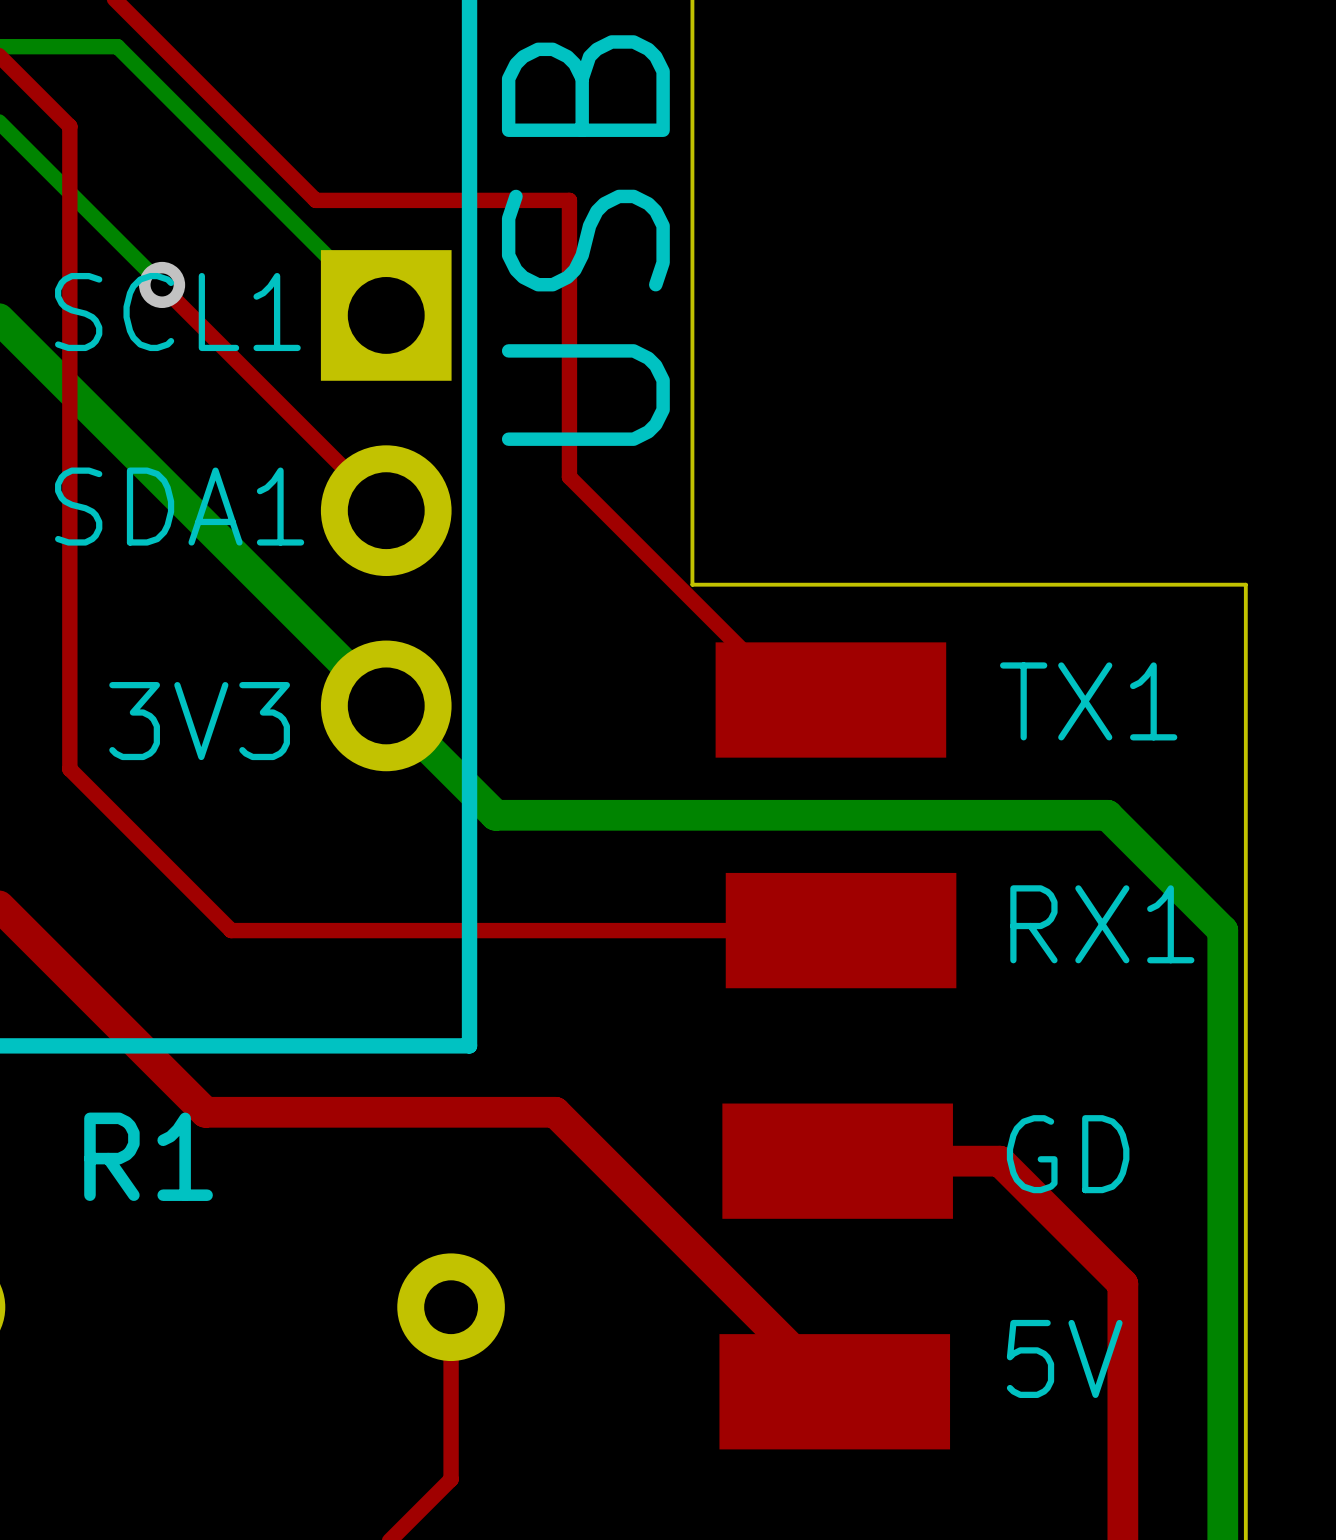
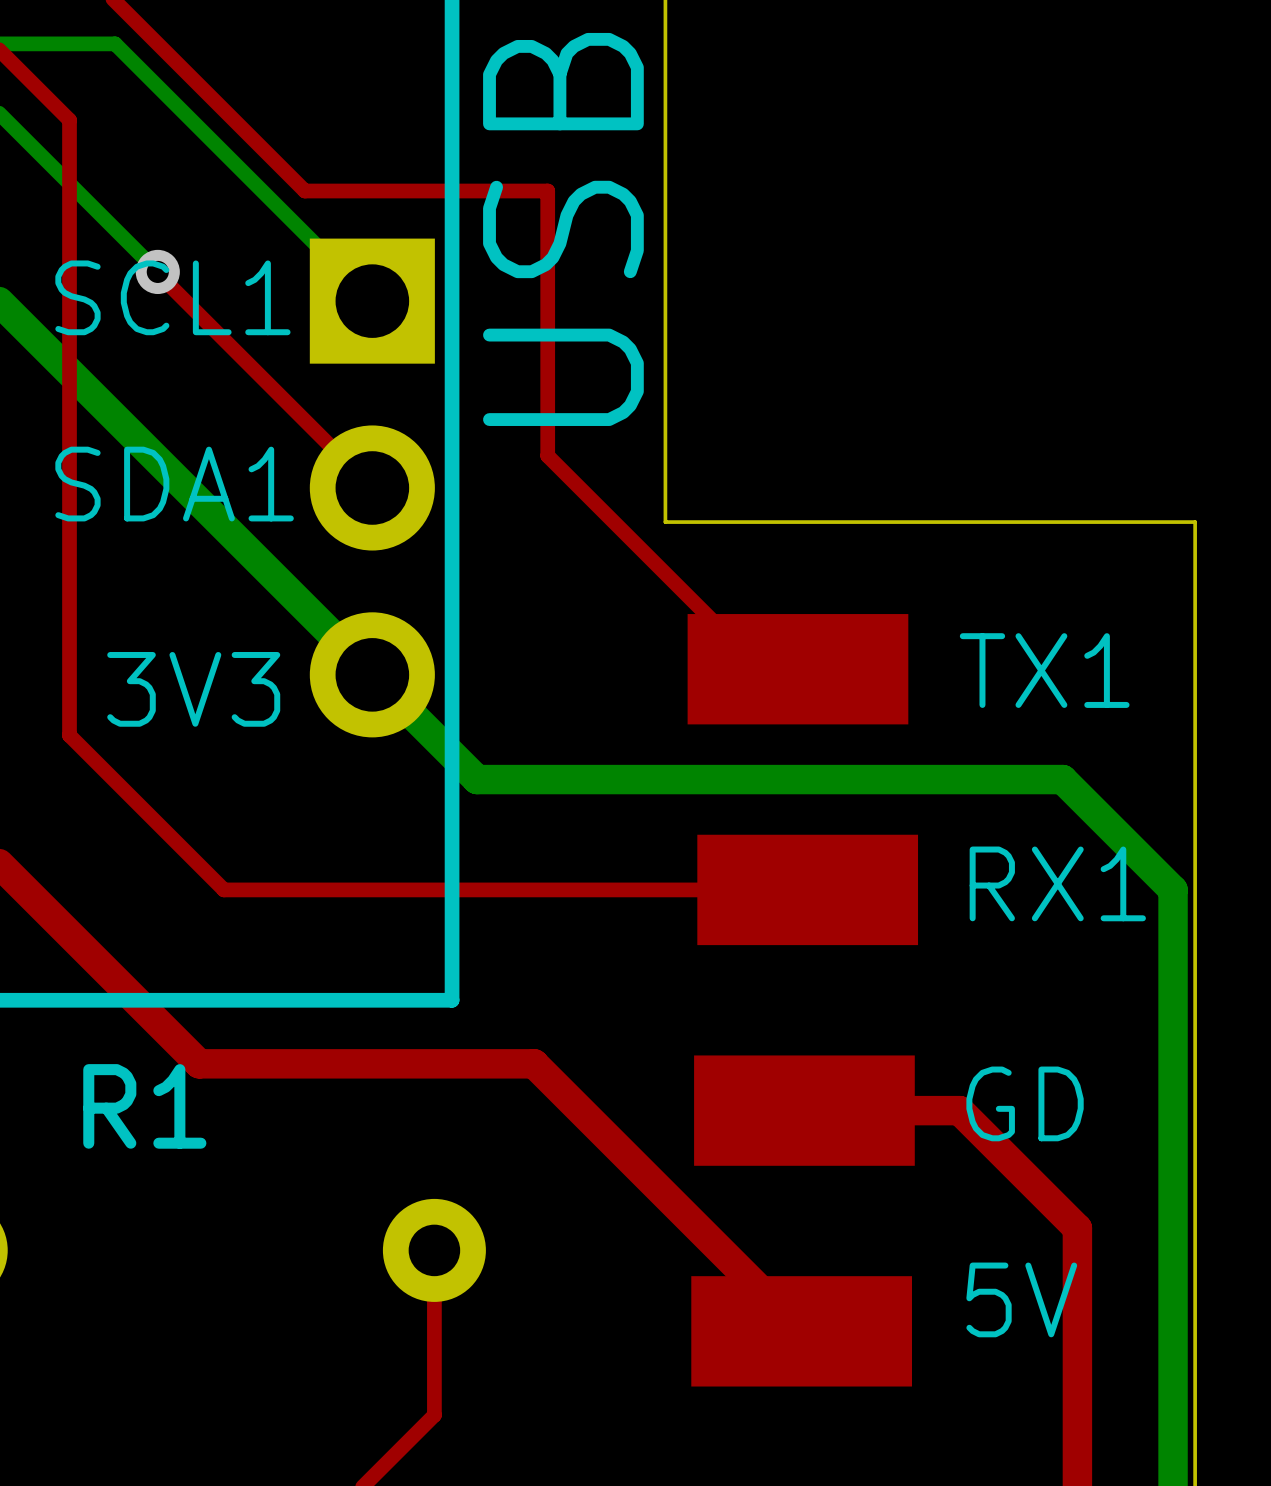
board edge: (692, 546) (692, 584) (1245, 584) -> (665, 522) (1195, 522) (1195, 558)

